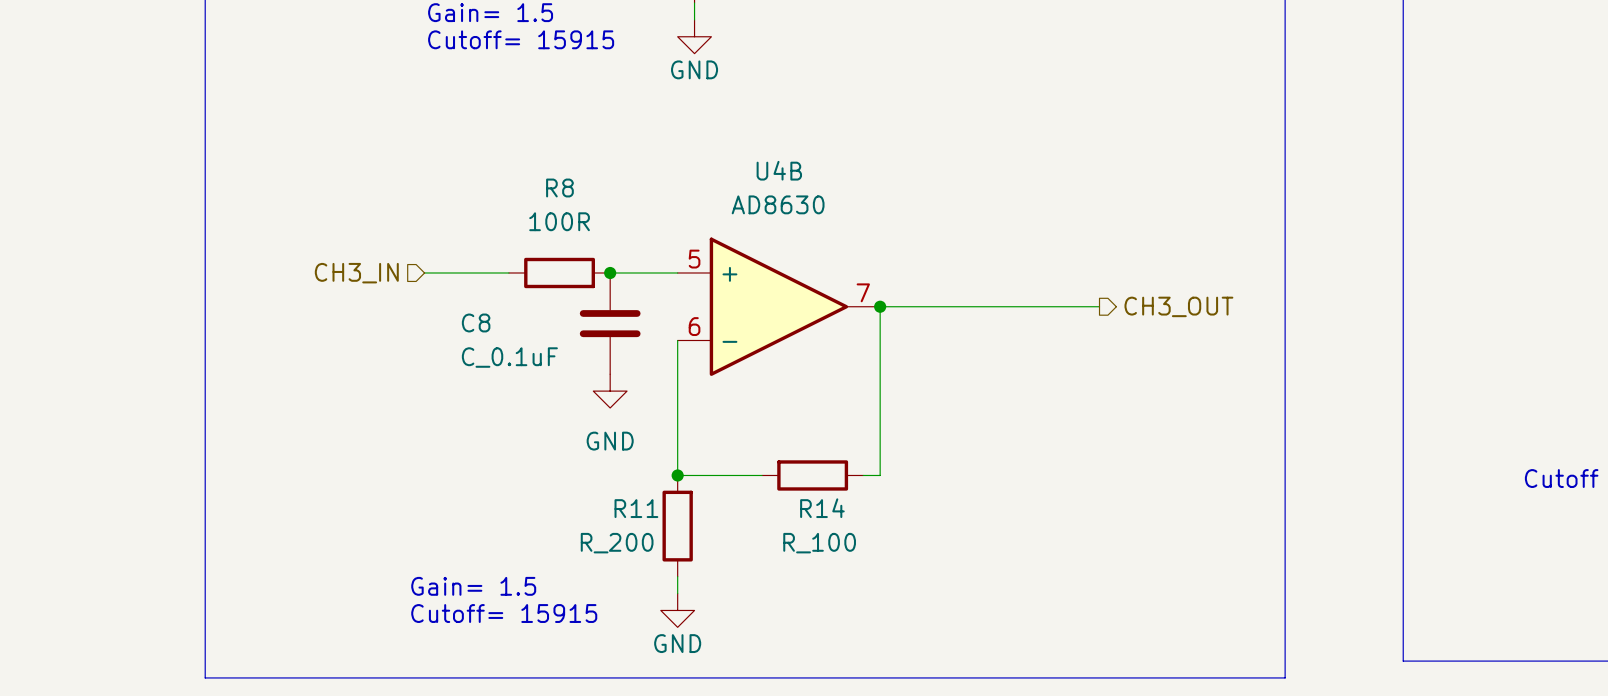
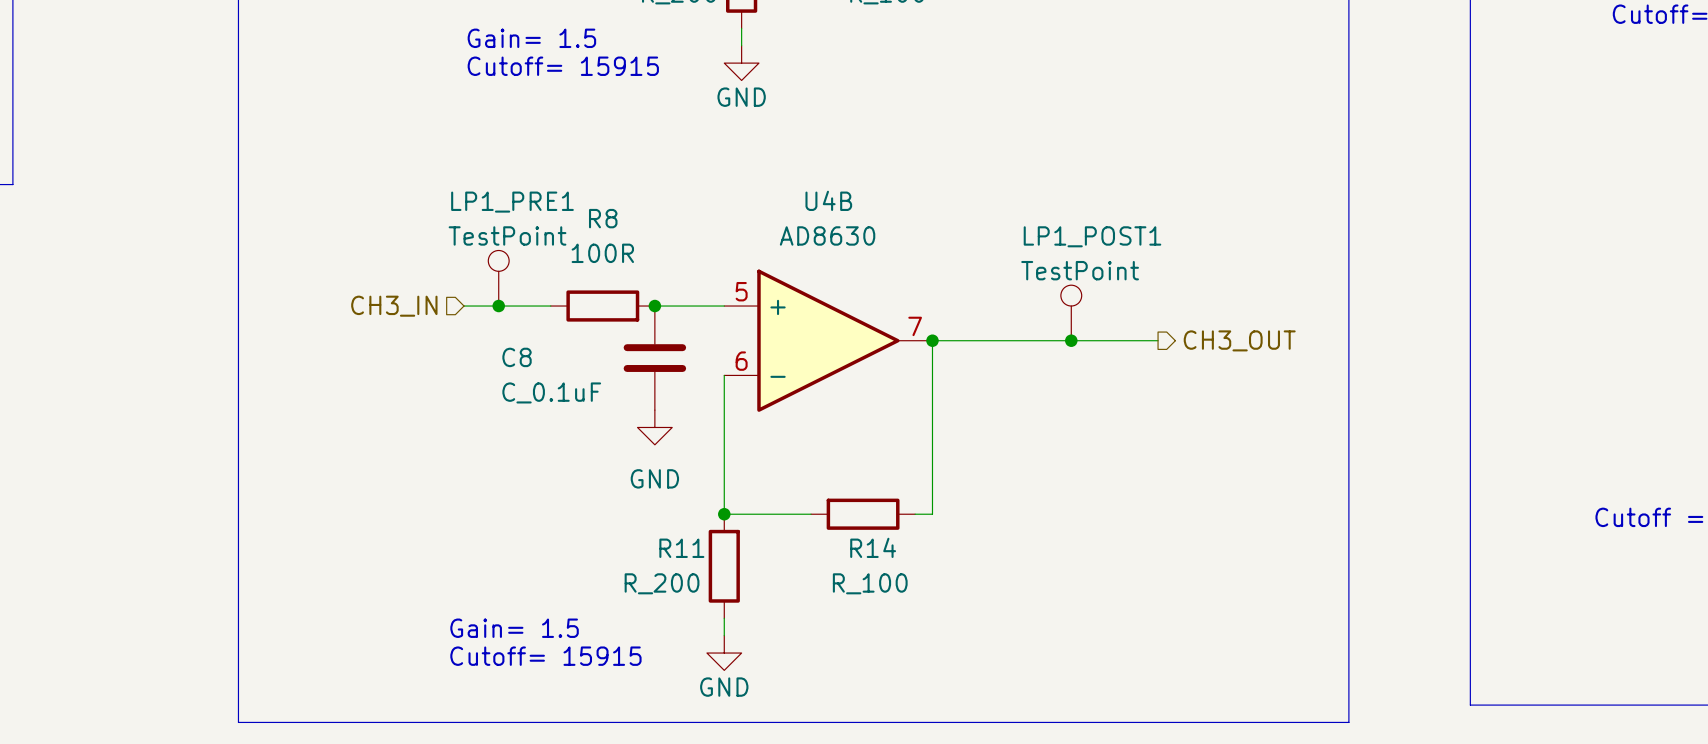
LP1_PRE1: none -> TestPoint (498, 278)
junction: none -> (498, 306)
LP1_POST1: none -> TestPoint (1071, 312)
junction: none -> (1071, 340)

